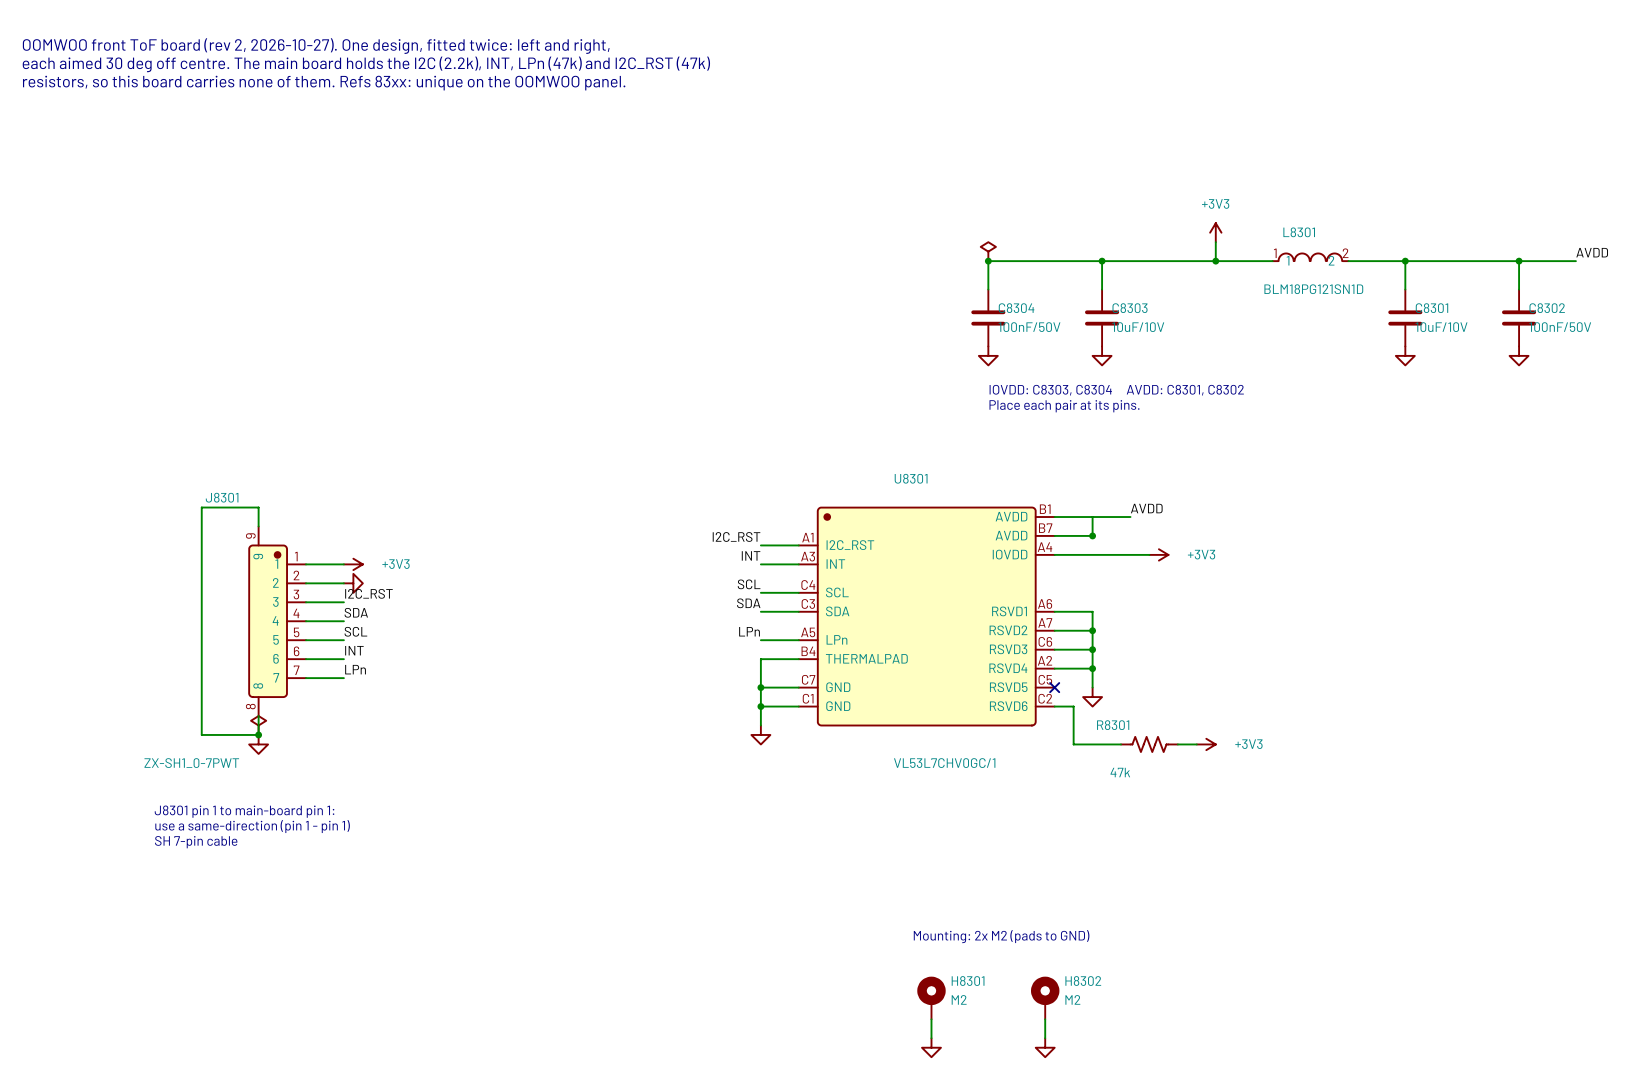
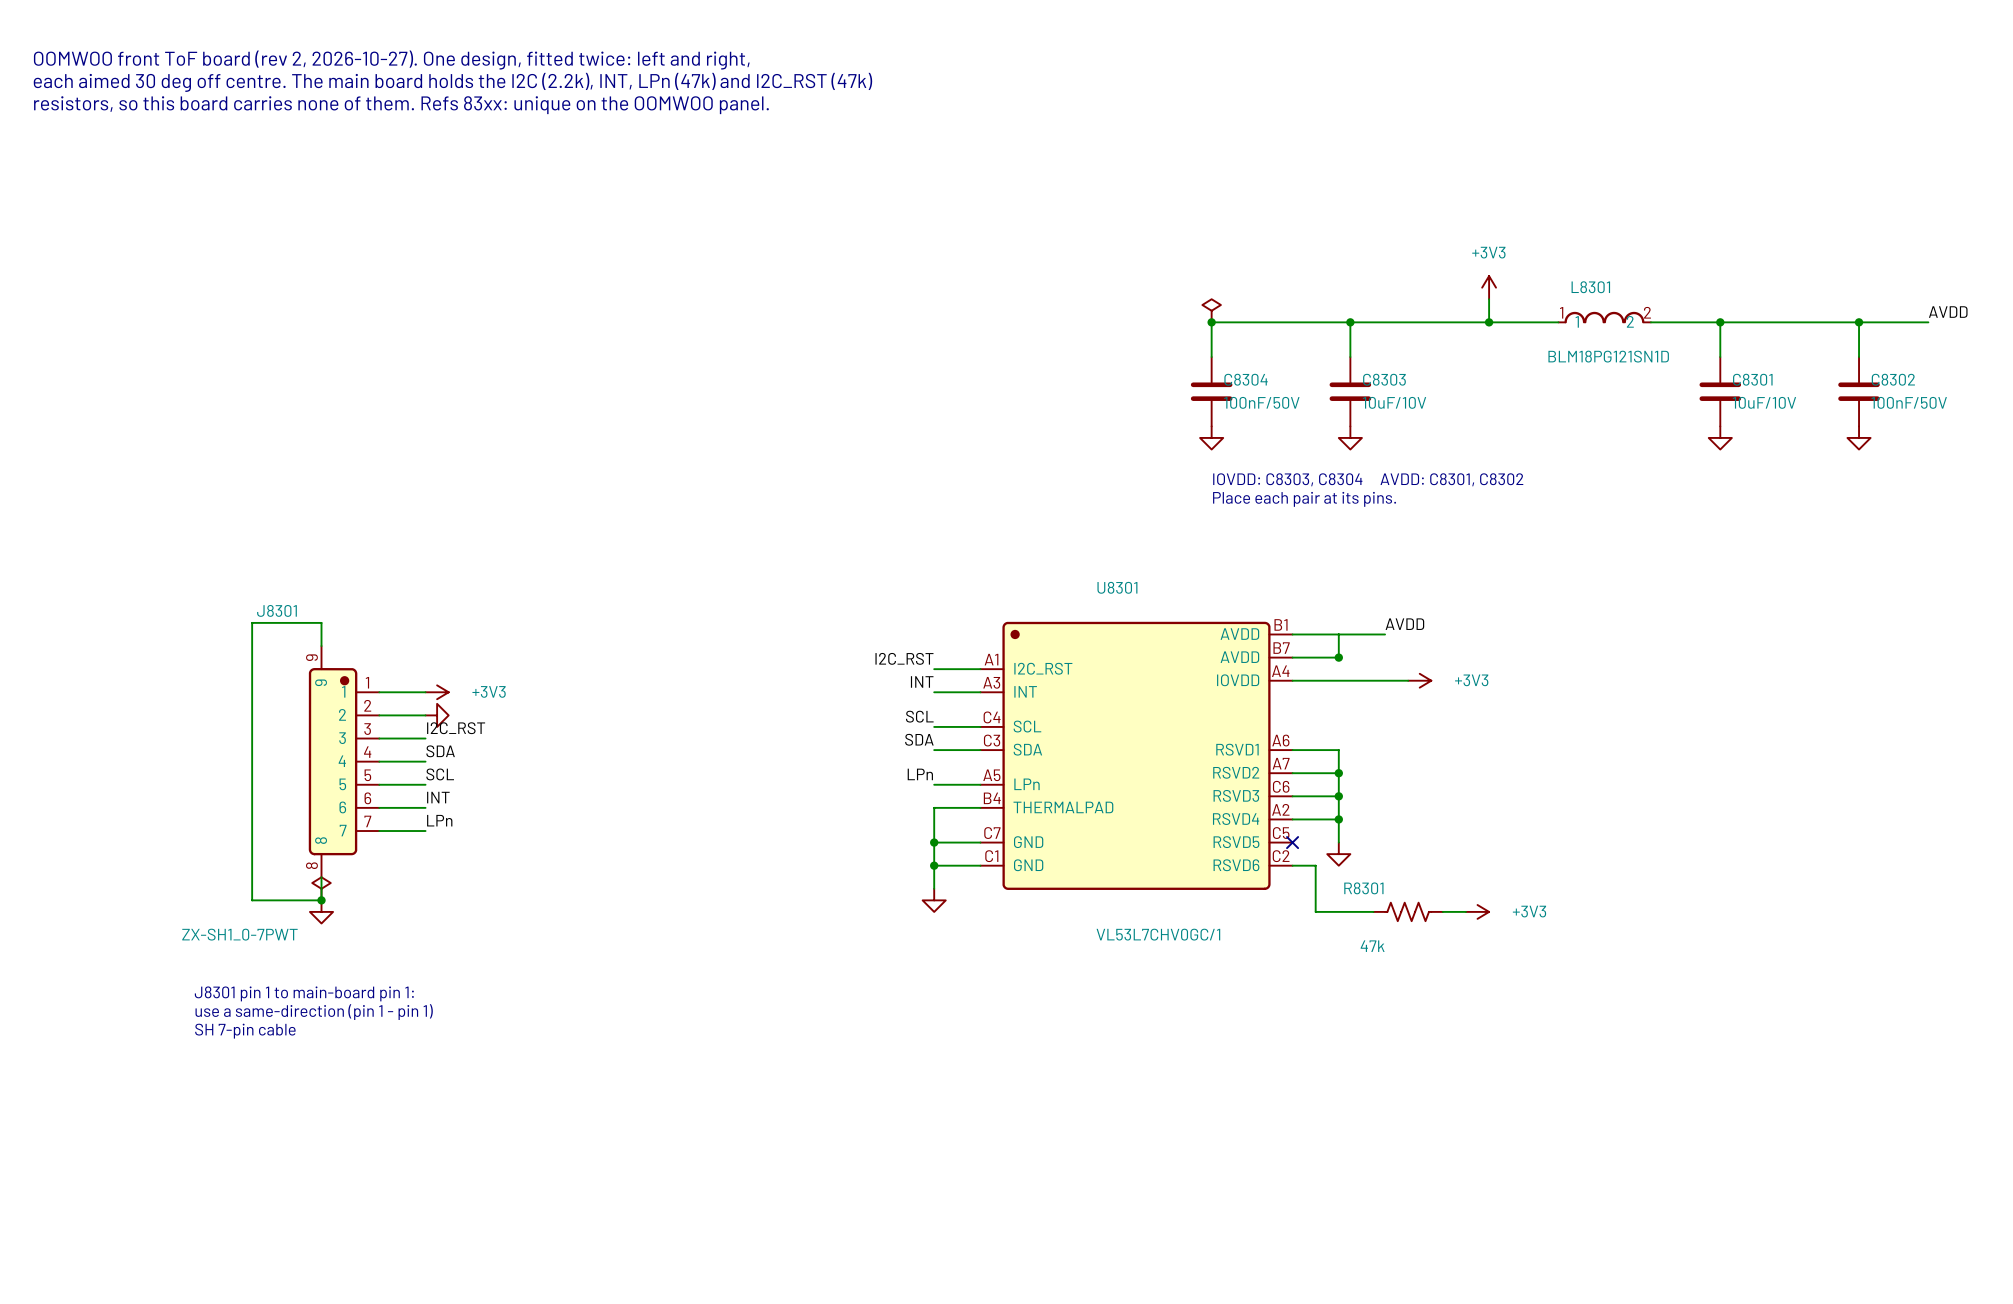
text: Mounting: 2x M2 (pads to GND) (1001, 936) -> none
H8301: M2 (931, 997) -> none
H8302: M2 (1045, 997) -> none
wire: (931, 1019) (931, 1038) -> none
wire: (1045, 1019) (1045, 1038) -> none
power symbol: (931, 1047) -> none
power symbol: (1045, 1047) -> none

